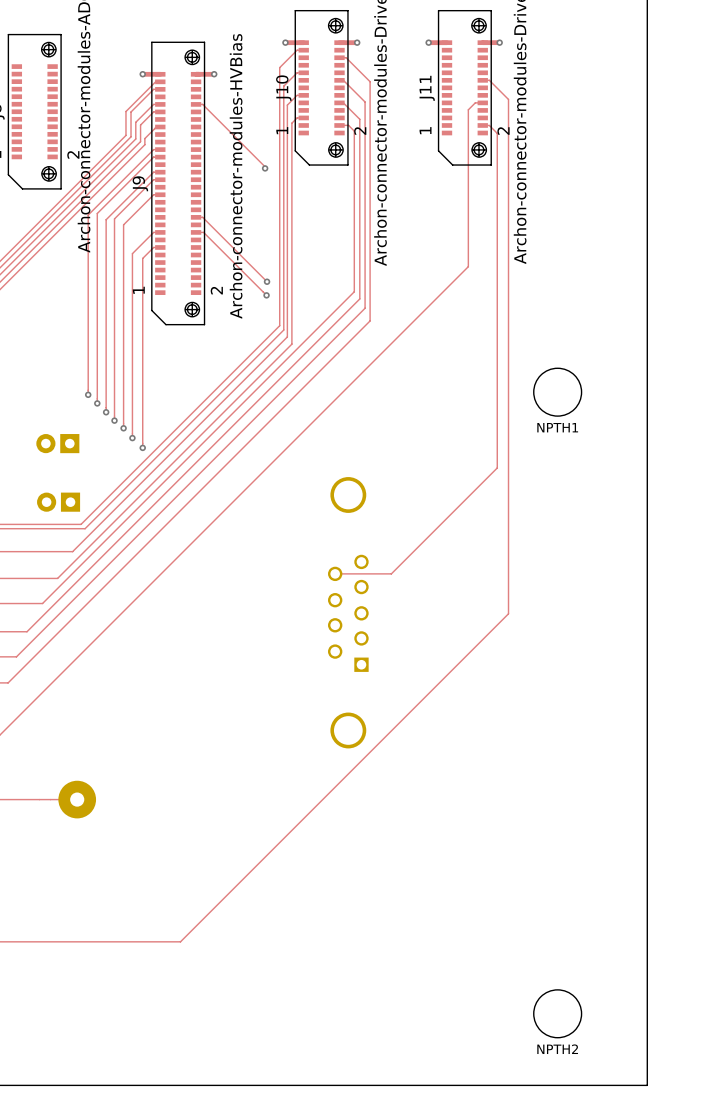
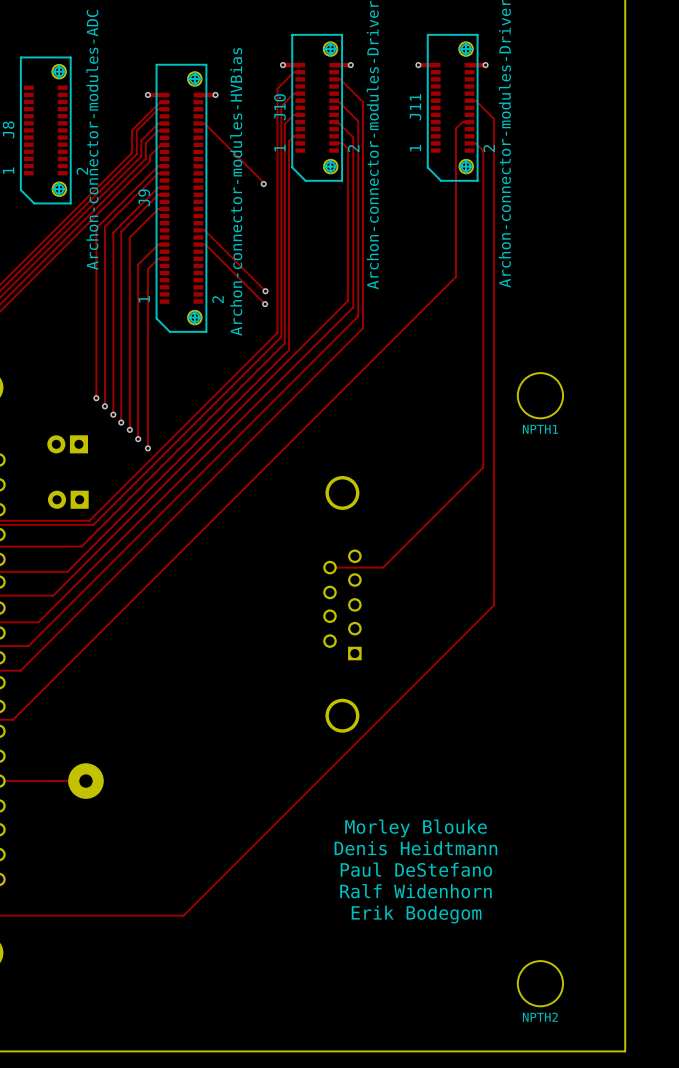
text: none -> Morley Blouke (415, 828)
text: none -> Denis Heidtmann (415, 848)
text: none -> Paul DeStefano (416, 869)
text: none -> Ralf Widenhorn (415, 891)
text: none -> Erik Bodegom (416, 914)

